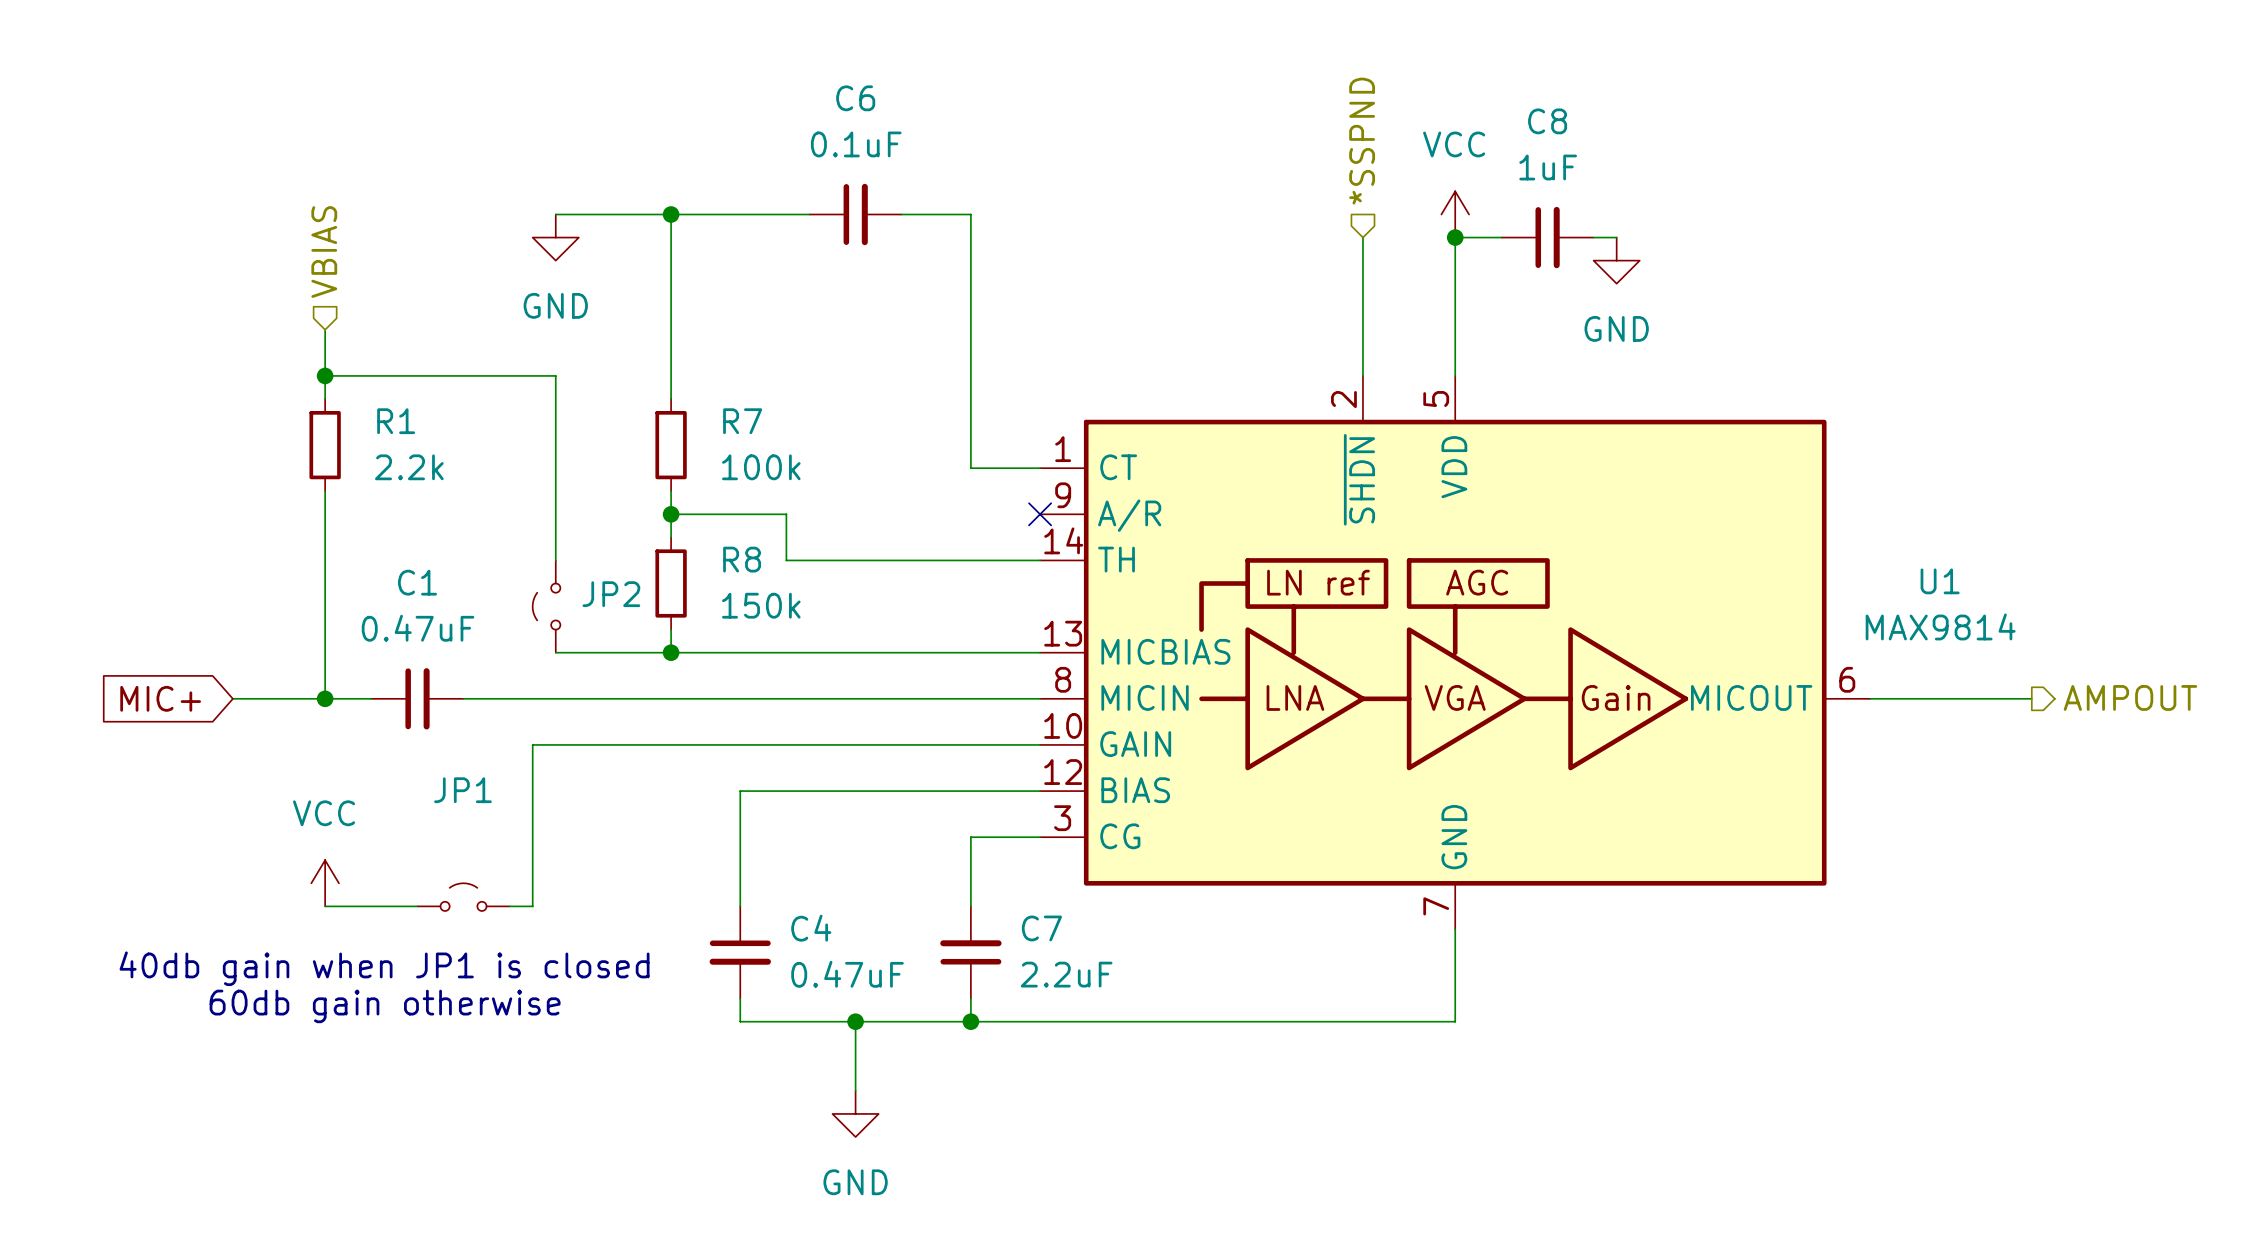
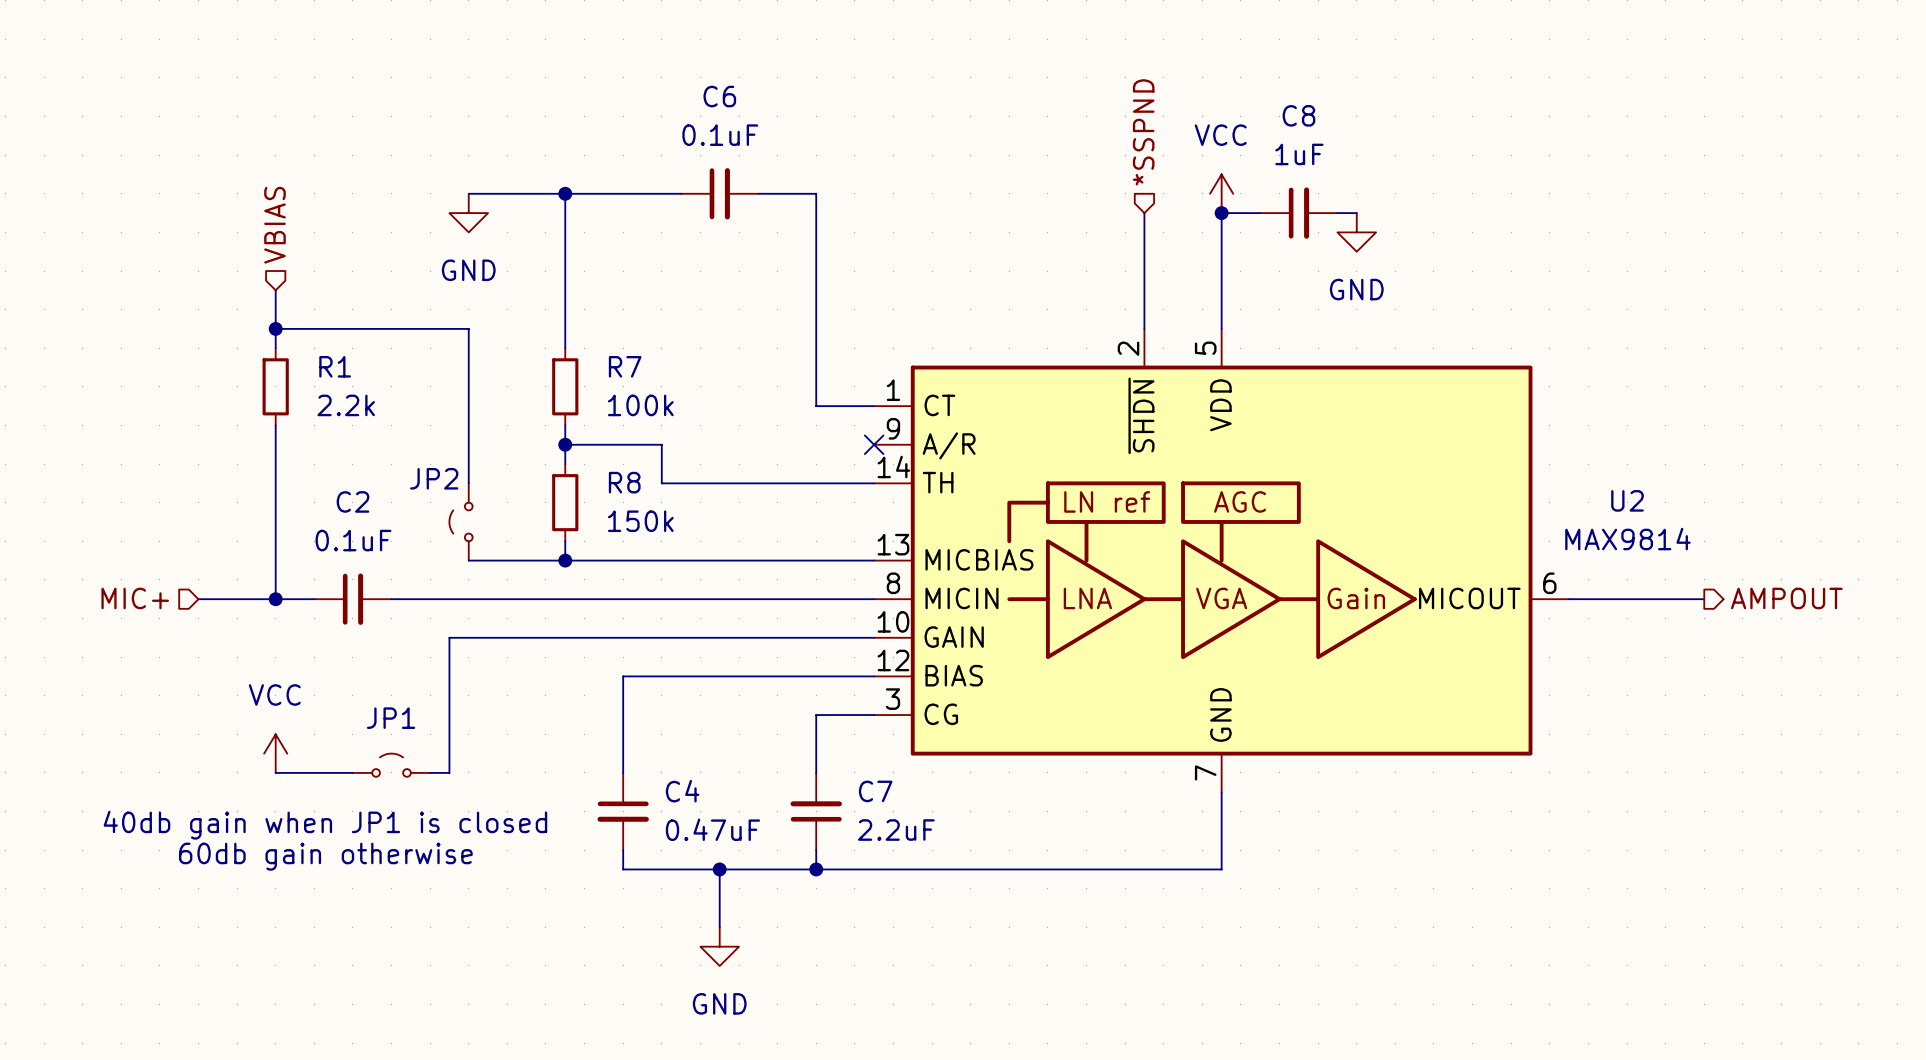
U1 name: U1 (1940, 581) -> U2 (1627, 500)
C1 name: C1 (417, 582) -> C2 (353, 501)
JP2 name position: JP2 (611, 594) -> JP2 (434, 478)
C1 value: 0.47uF (418, 628) -> 0.1uF (353, 540)
hierarchical label: none -> MIC+ (135, 598)
global label: MIC+ (160, 698) -> none
JP1 name position: JP1 (462, 790) -> JP1 (391, 718)

